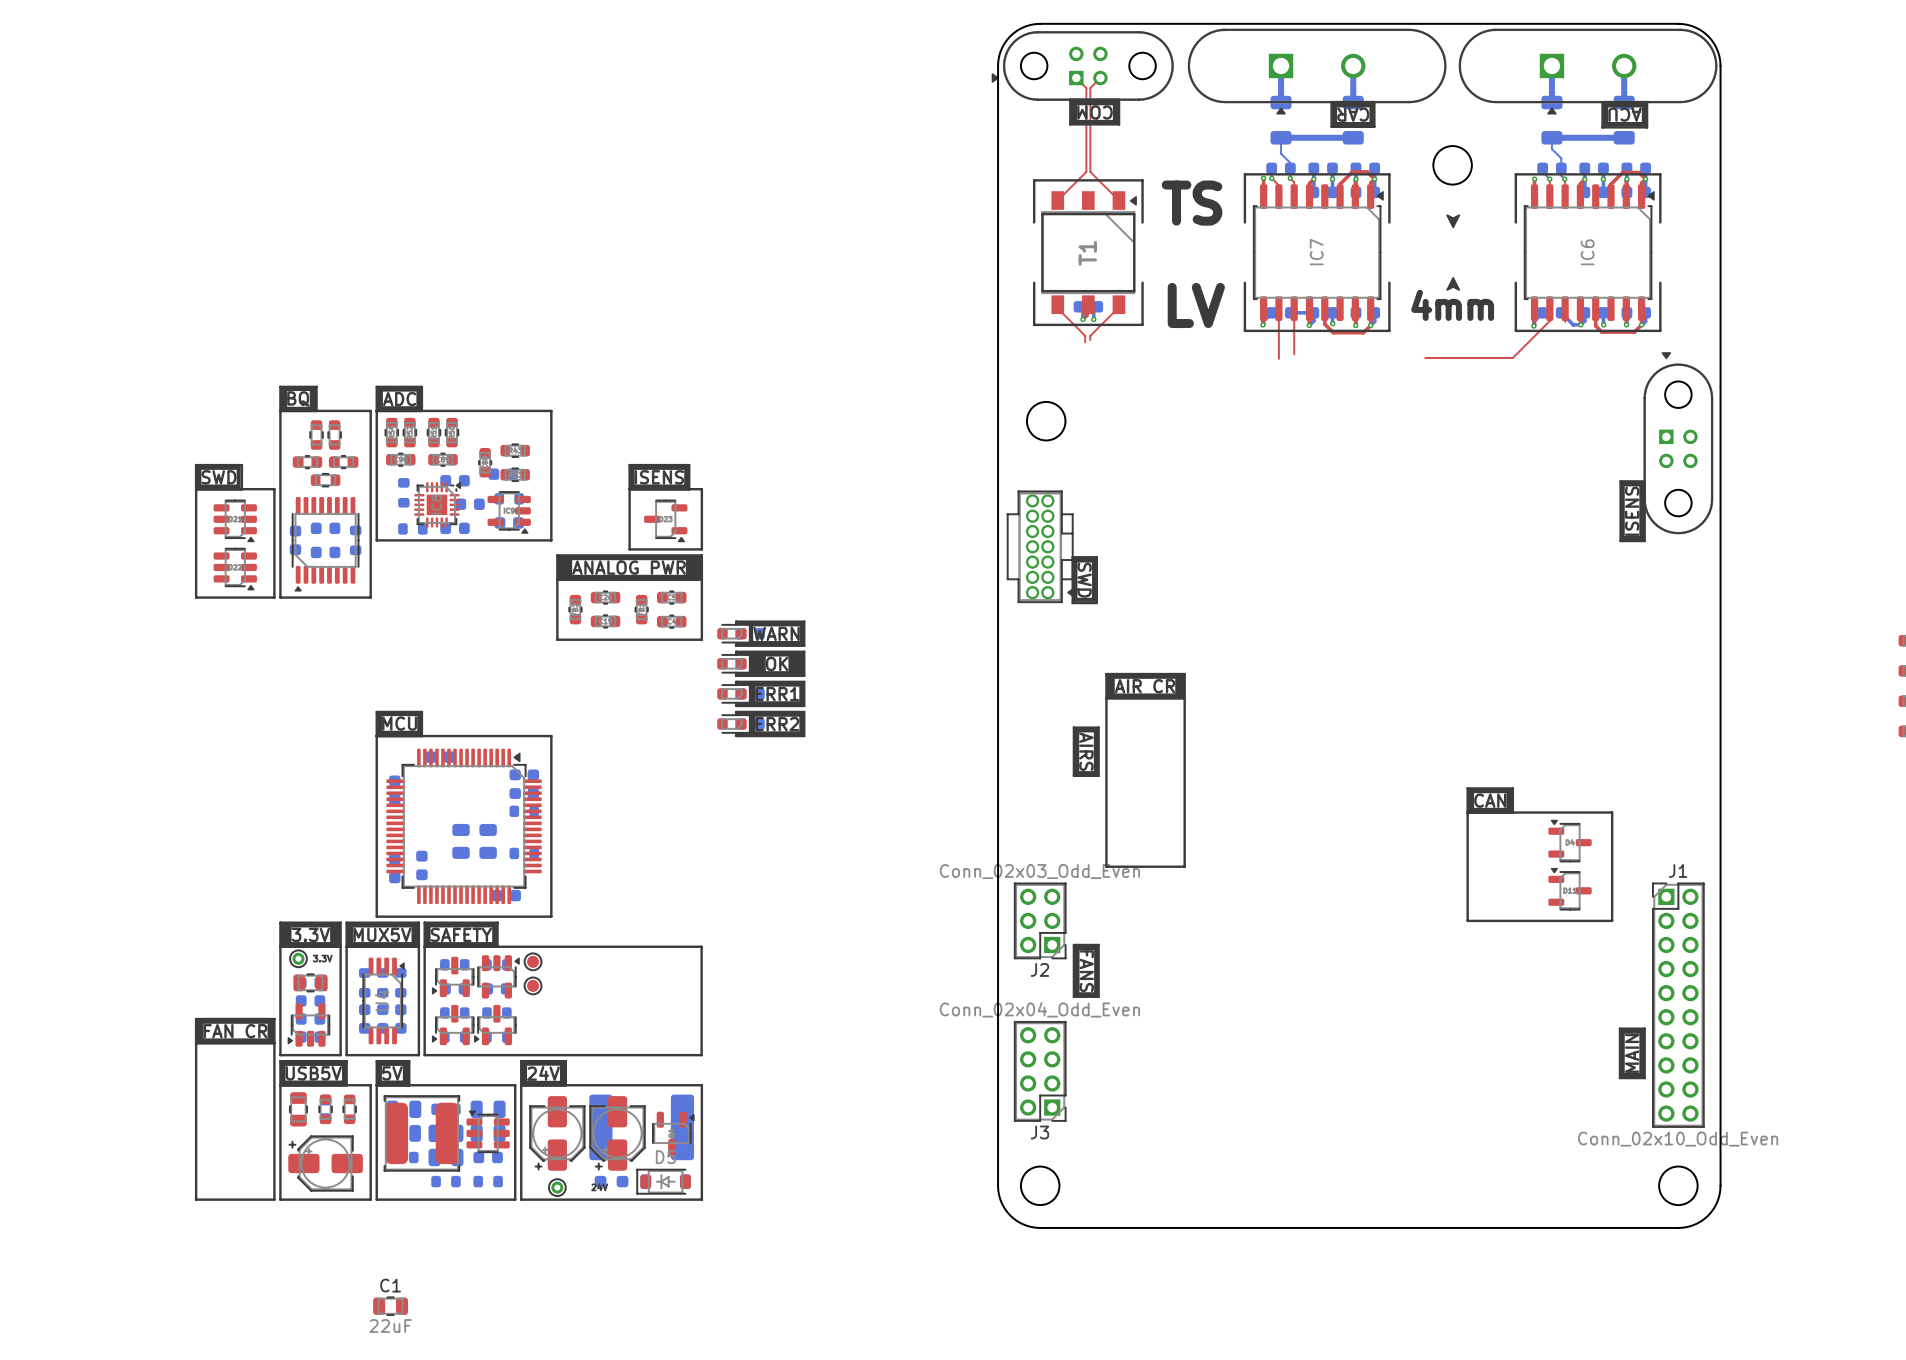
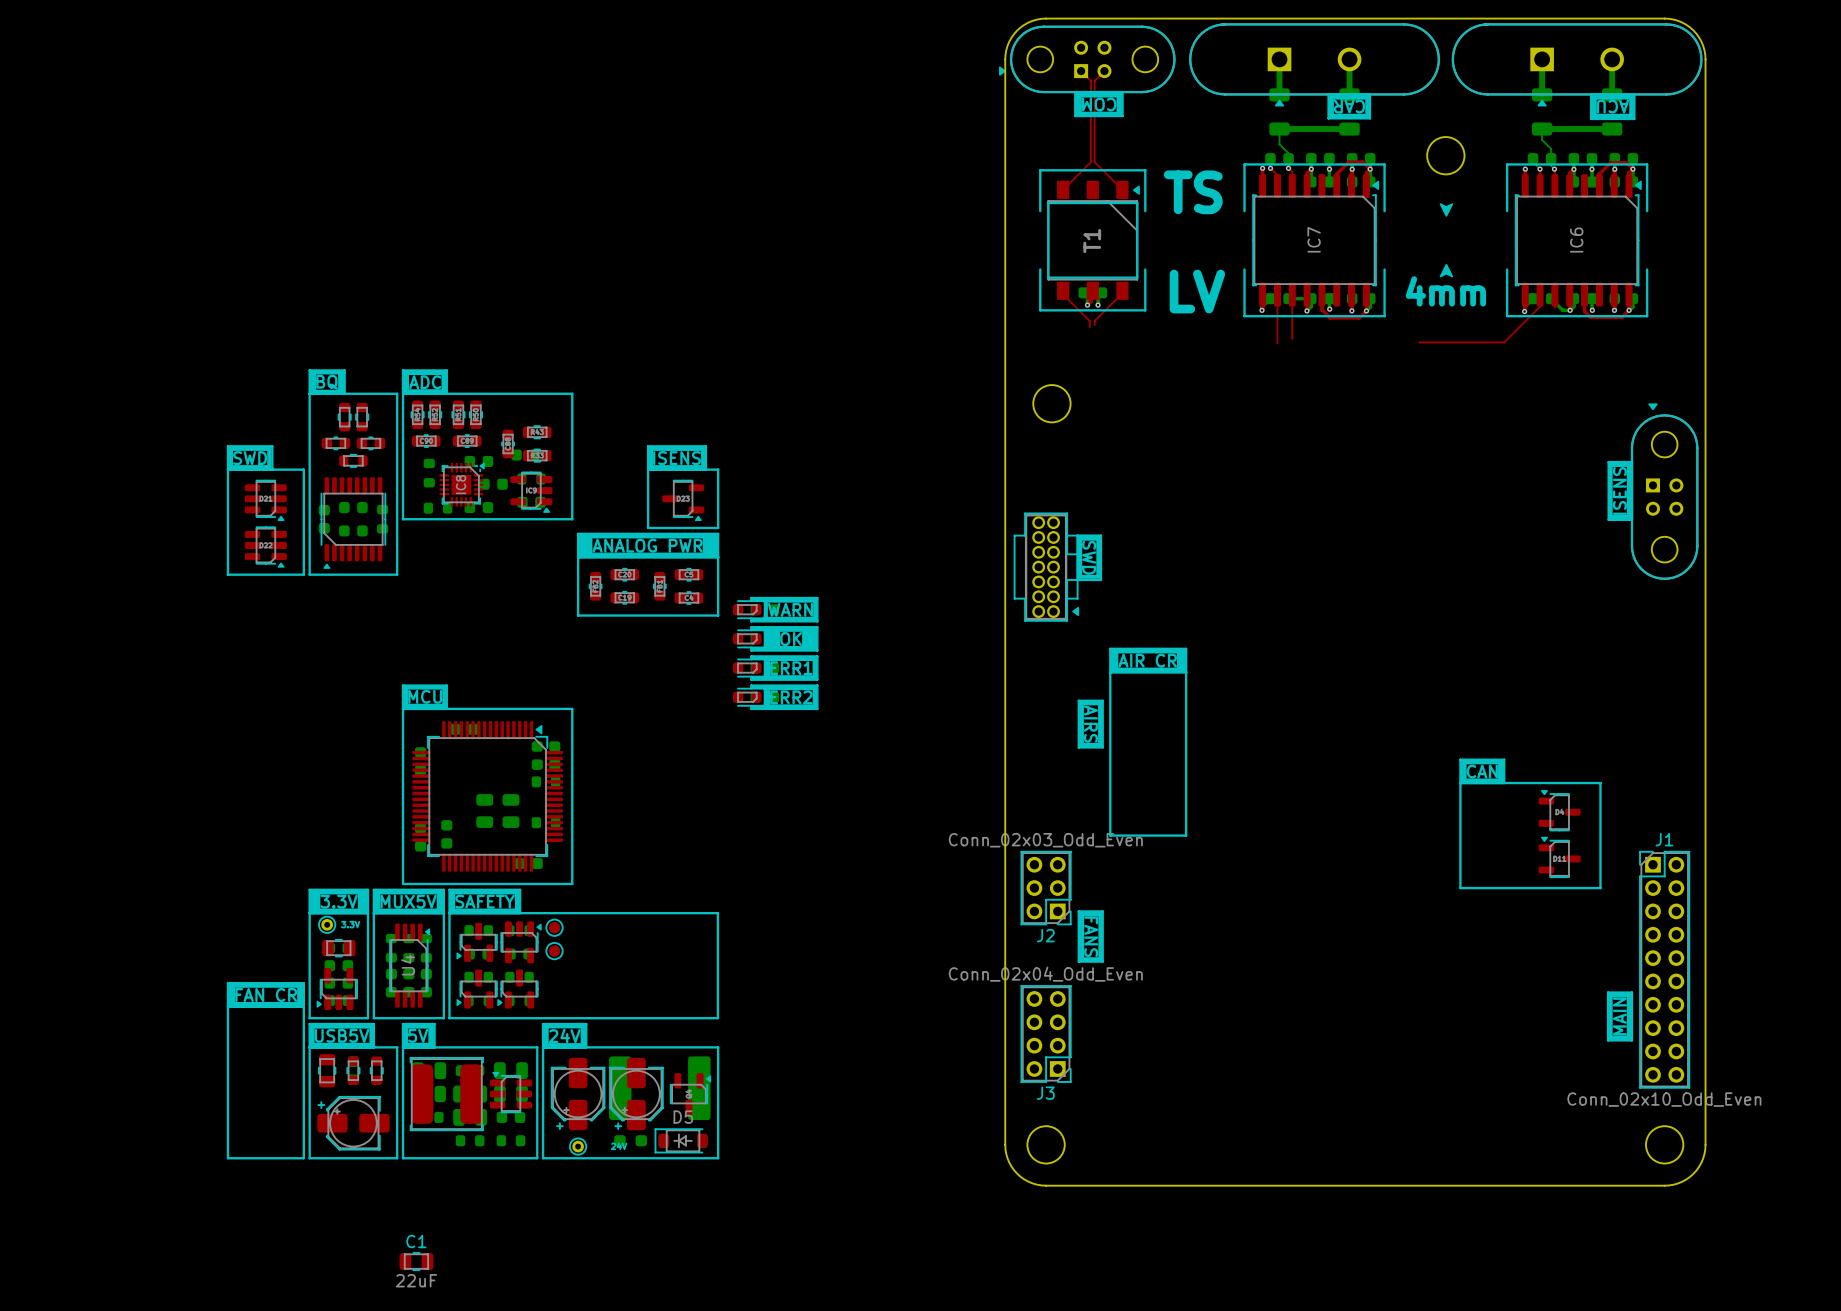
part position: (1678, 443) -> (1664, 491)
part position: (1040, 546) -> (1046, 567)

